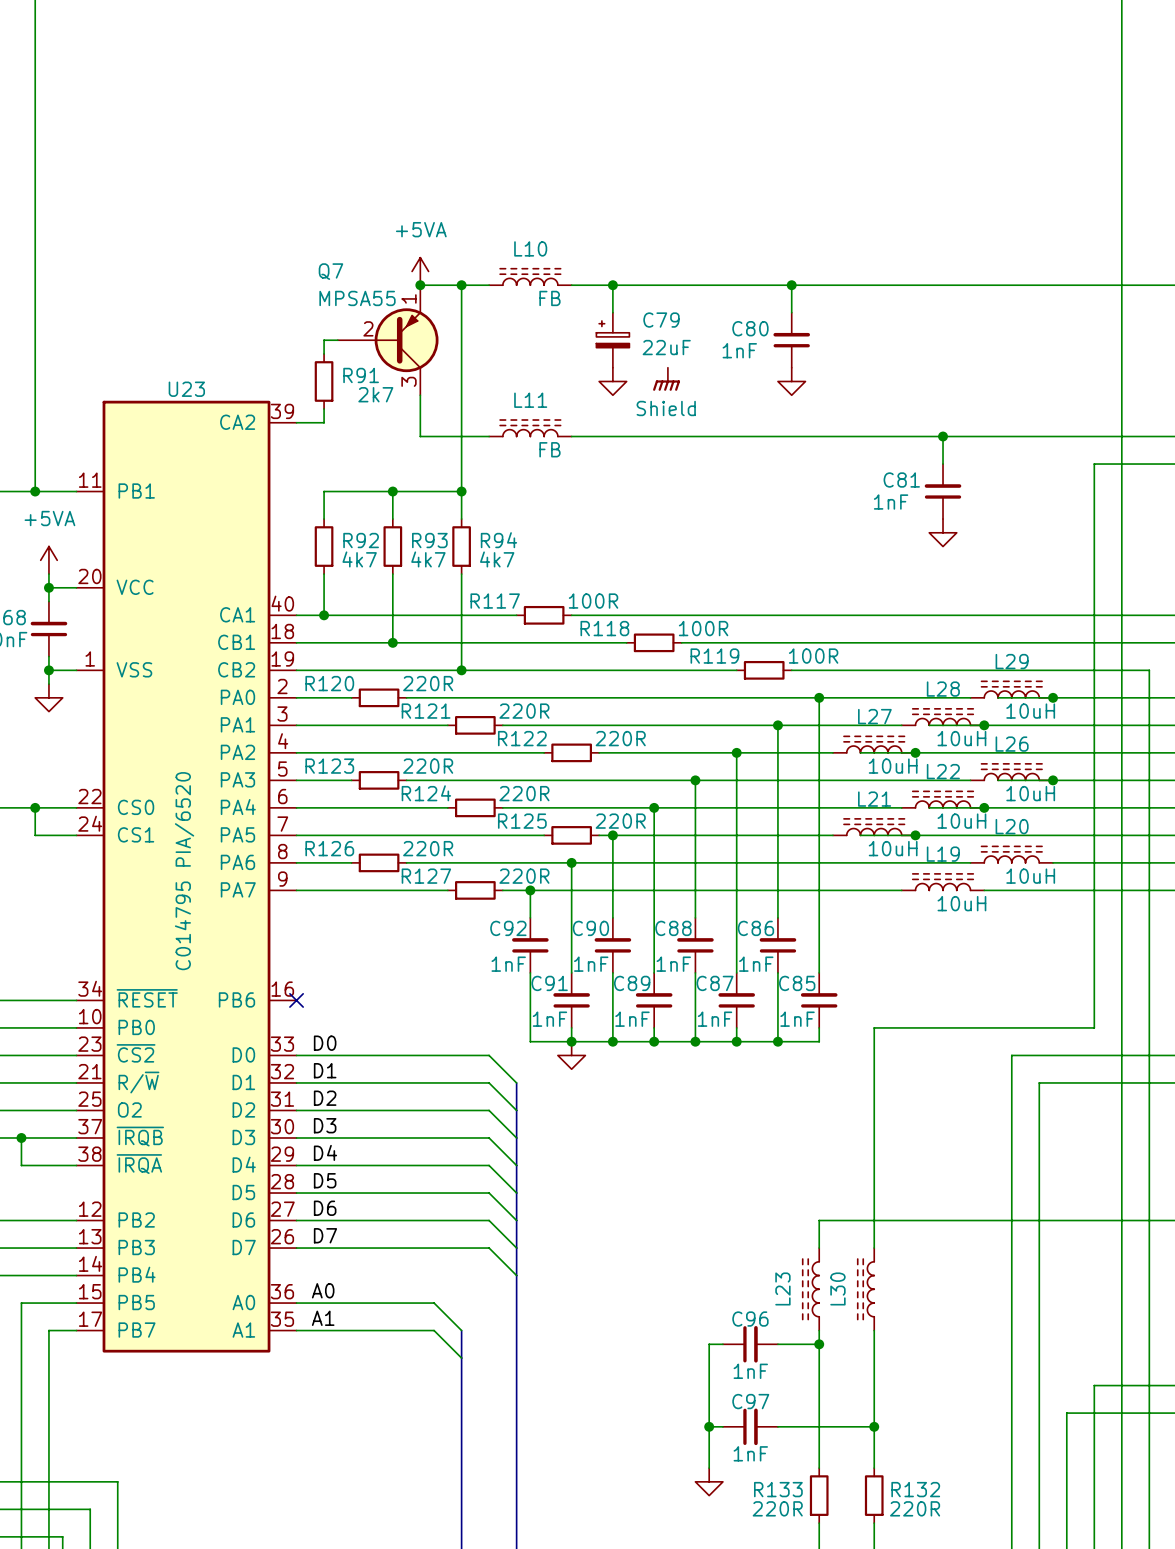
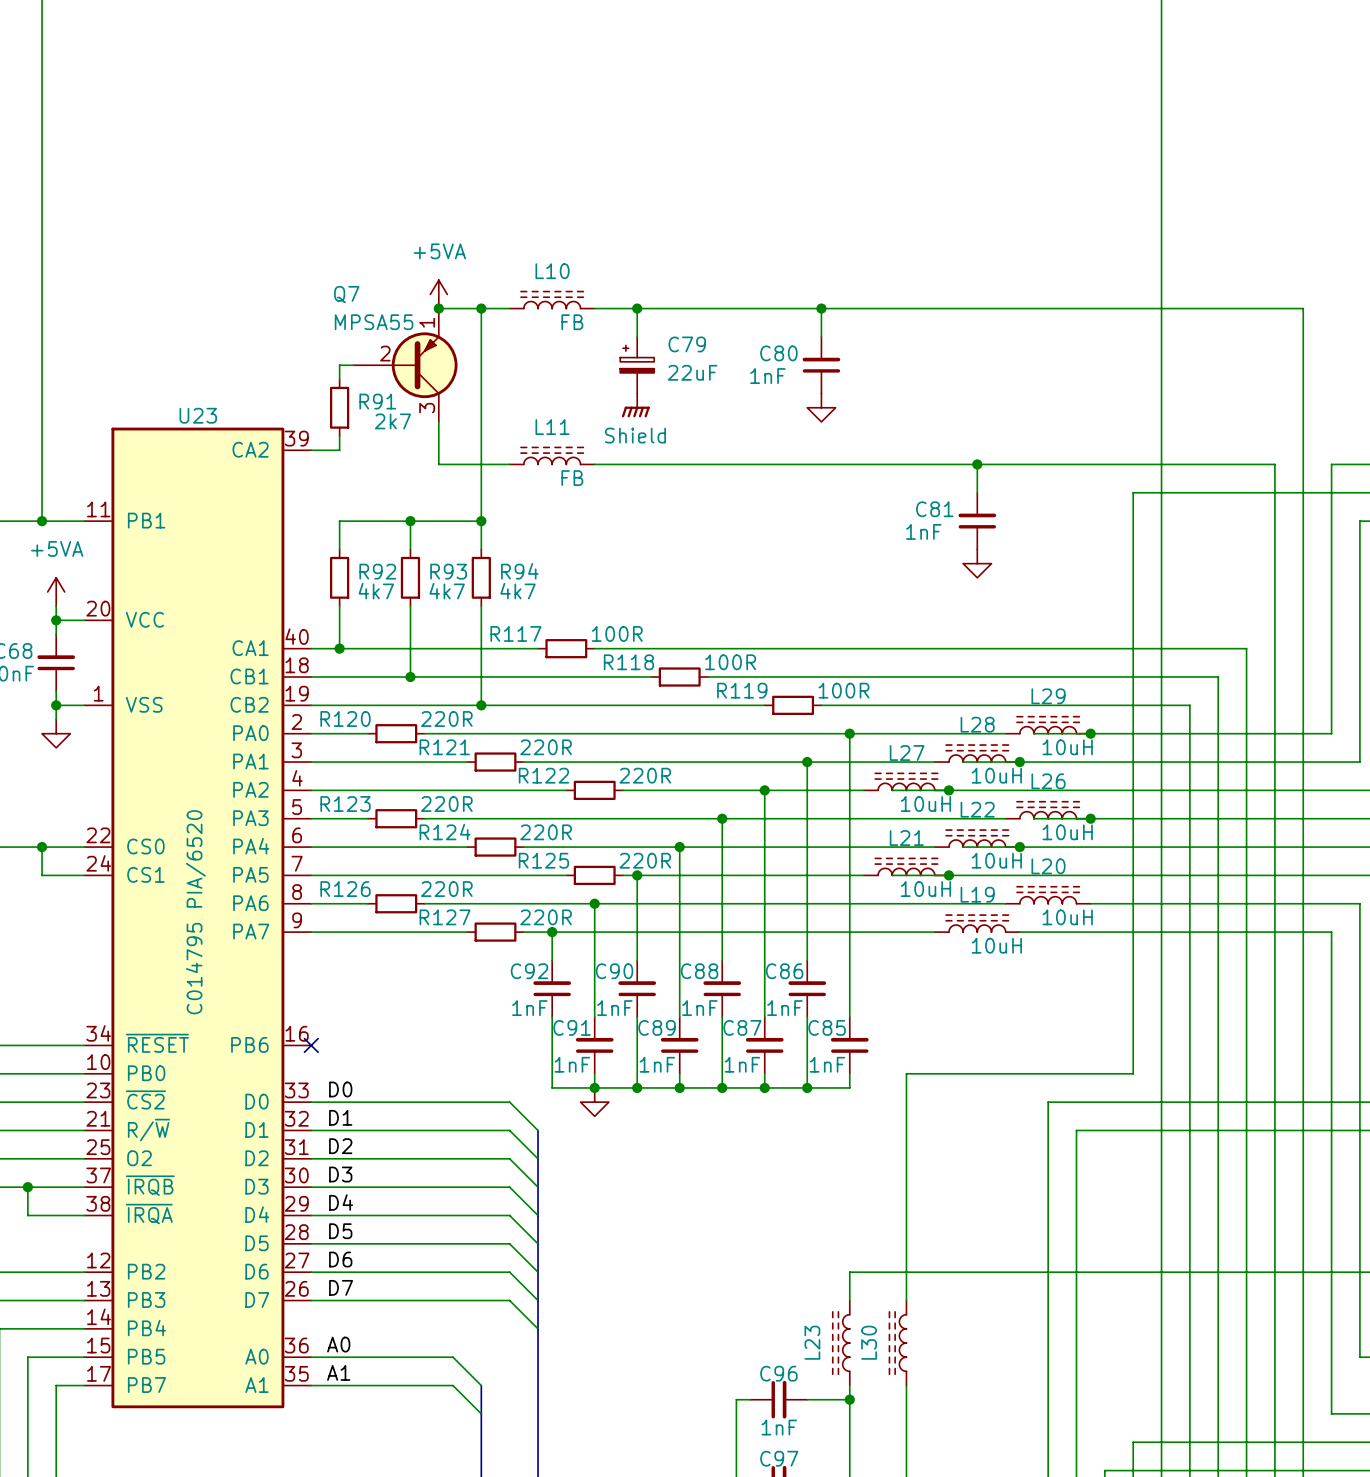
power symbol shape: [599, 367, 627, 396] -> [621, 393, 650, 418]
power symbol: Shield (666, 379) -> none
power symbol text: none -> Shield (635, 435)

